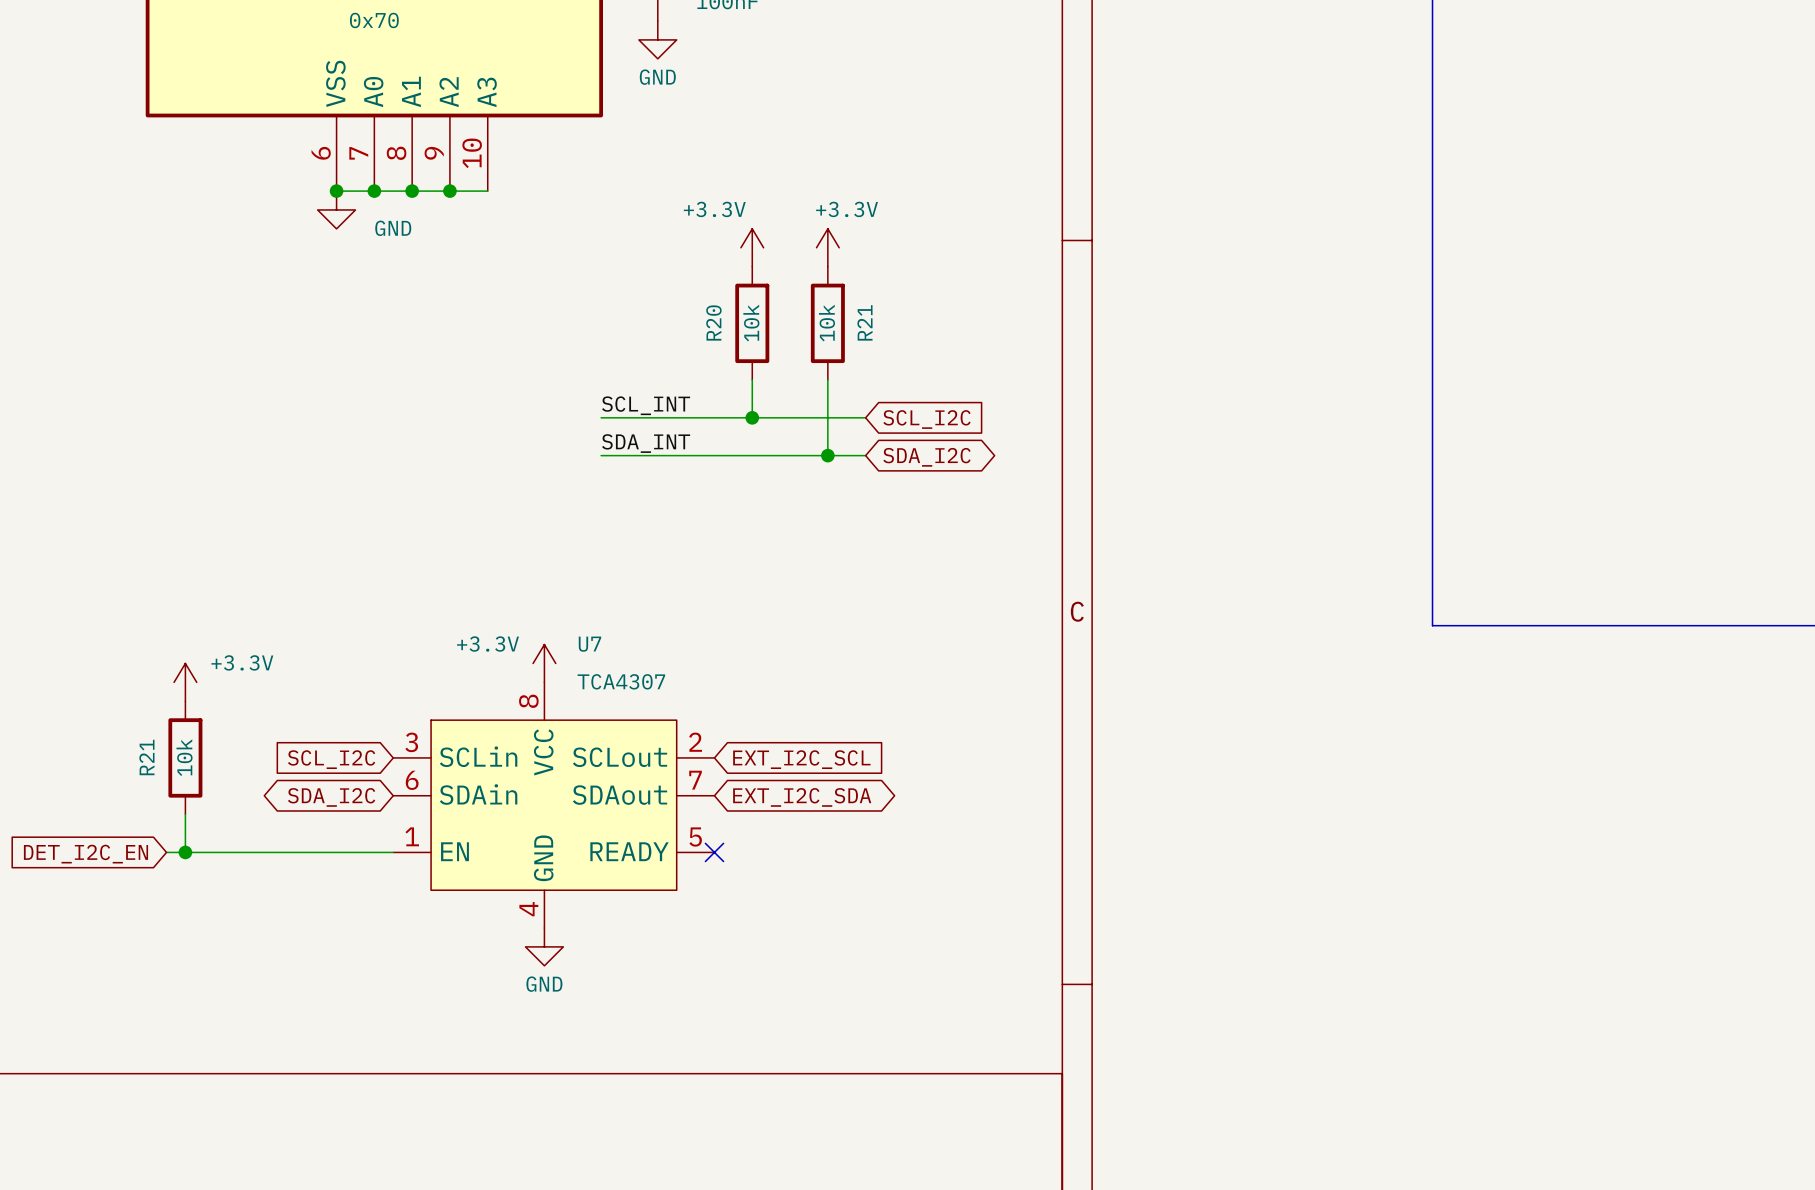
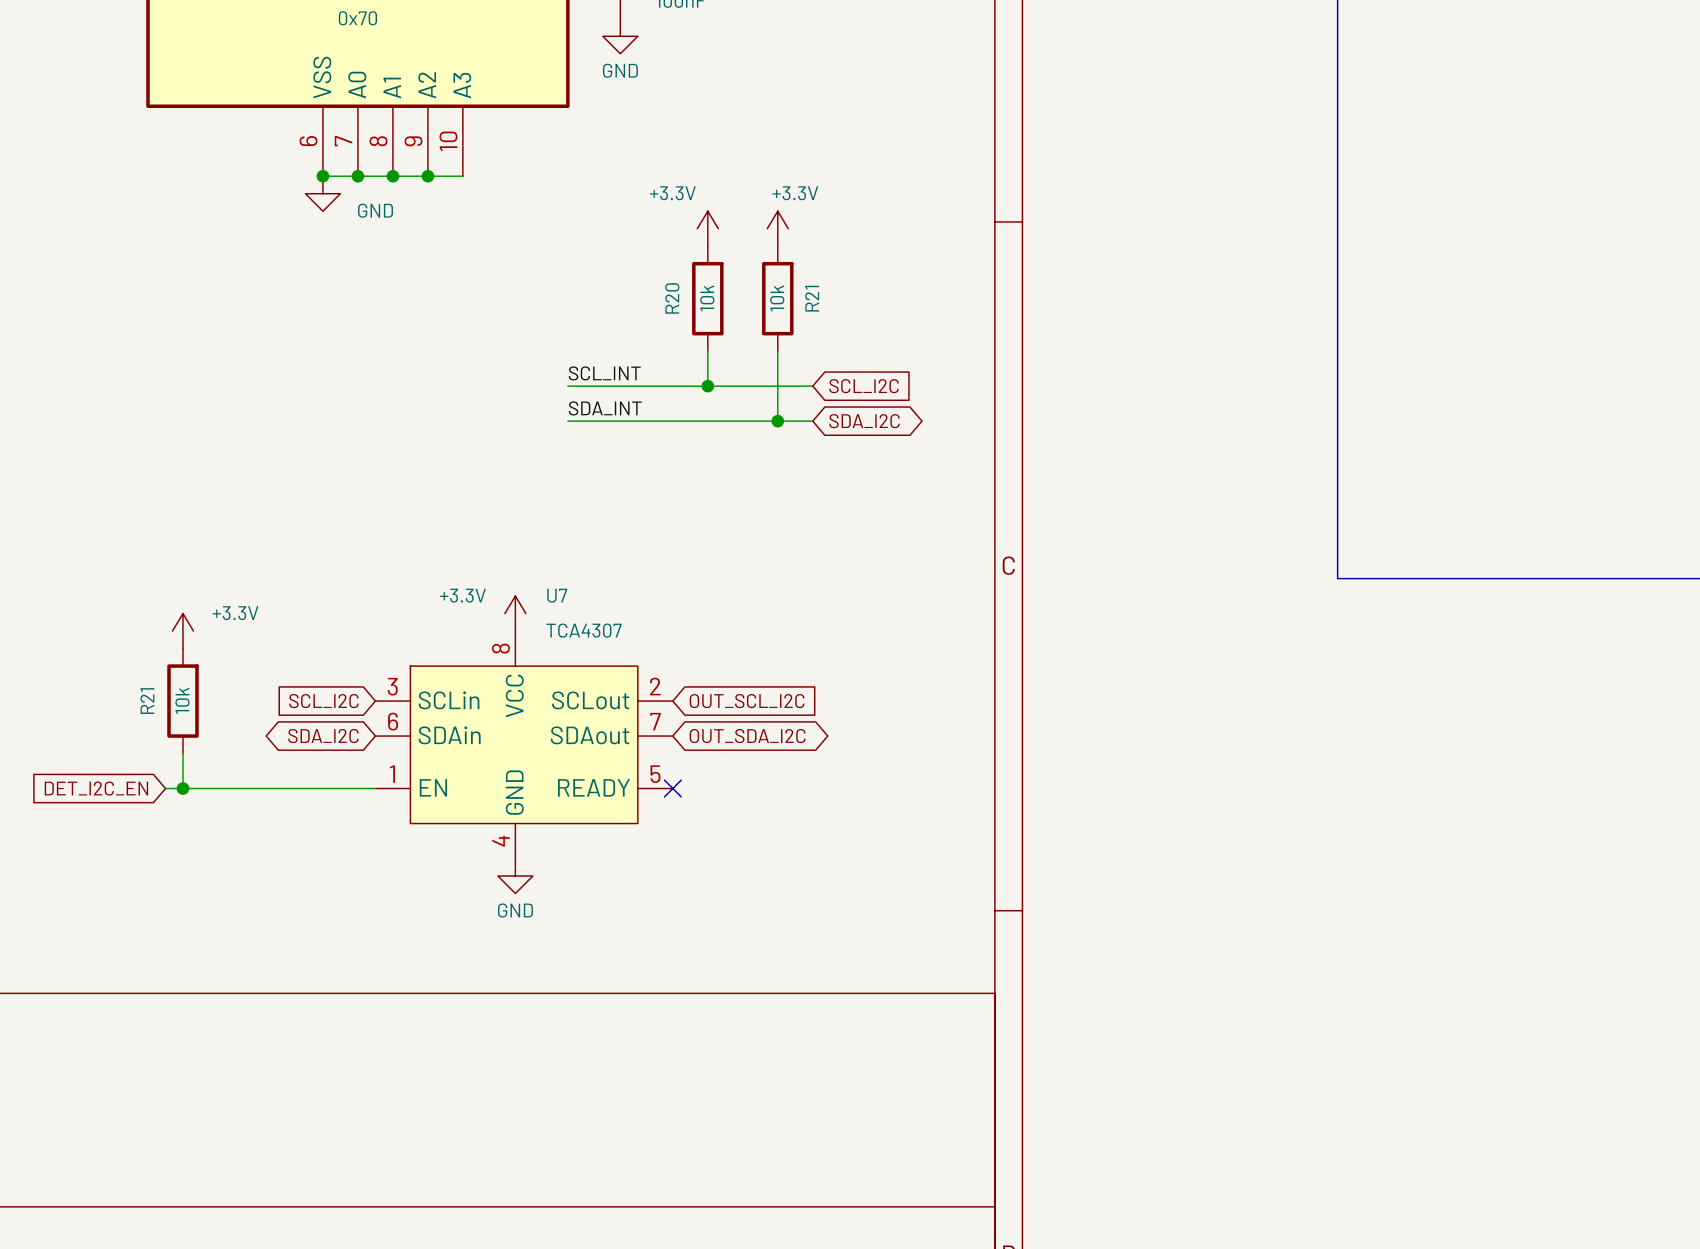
global label: EXT_I2C_SCL (801, 759) -> OUT_SCL_I2C (747, 701)
global label: EXT_I2C_SDA (802, 797) -> OUT_SDA_I2C (747, 736)

